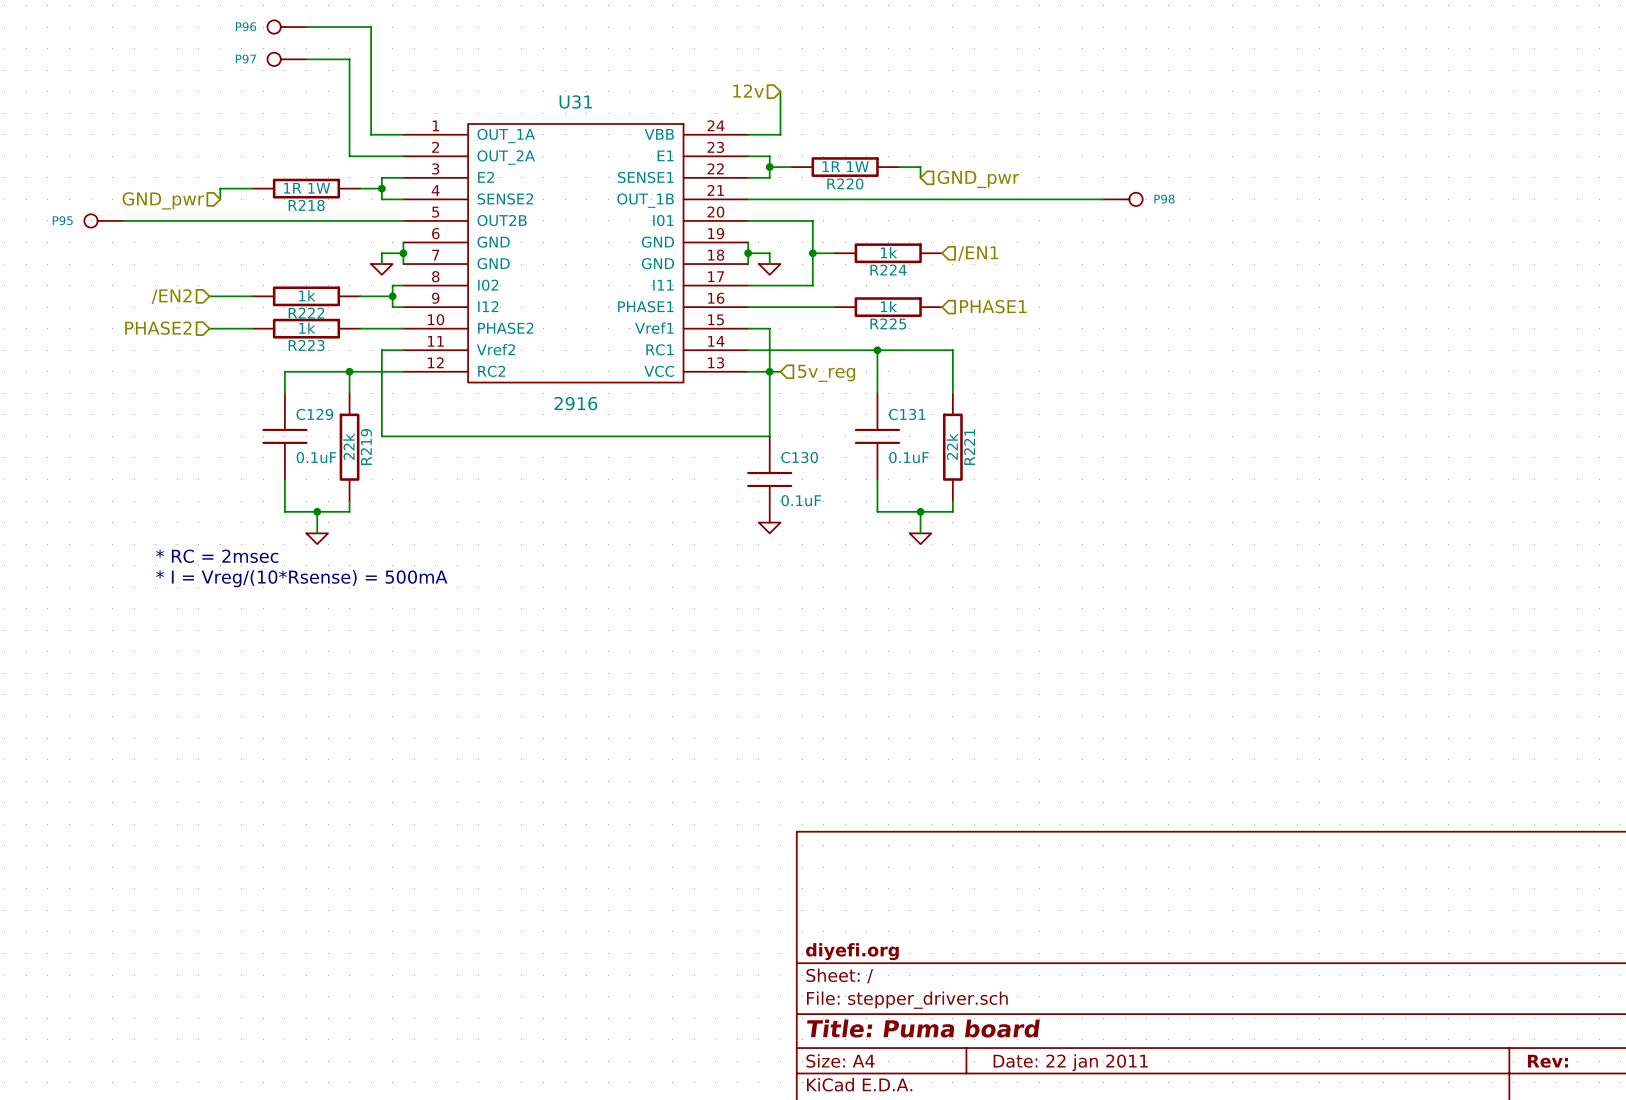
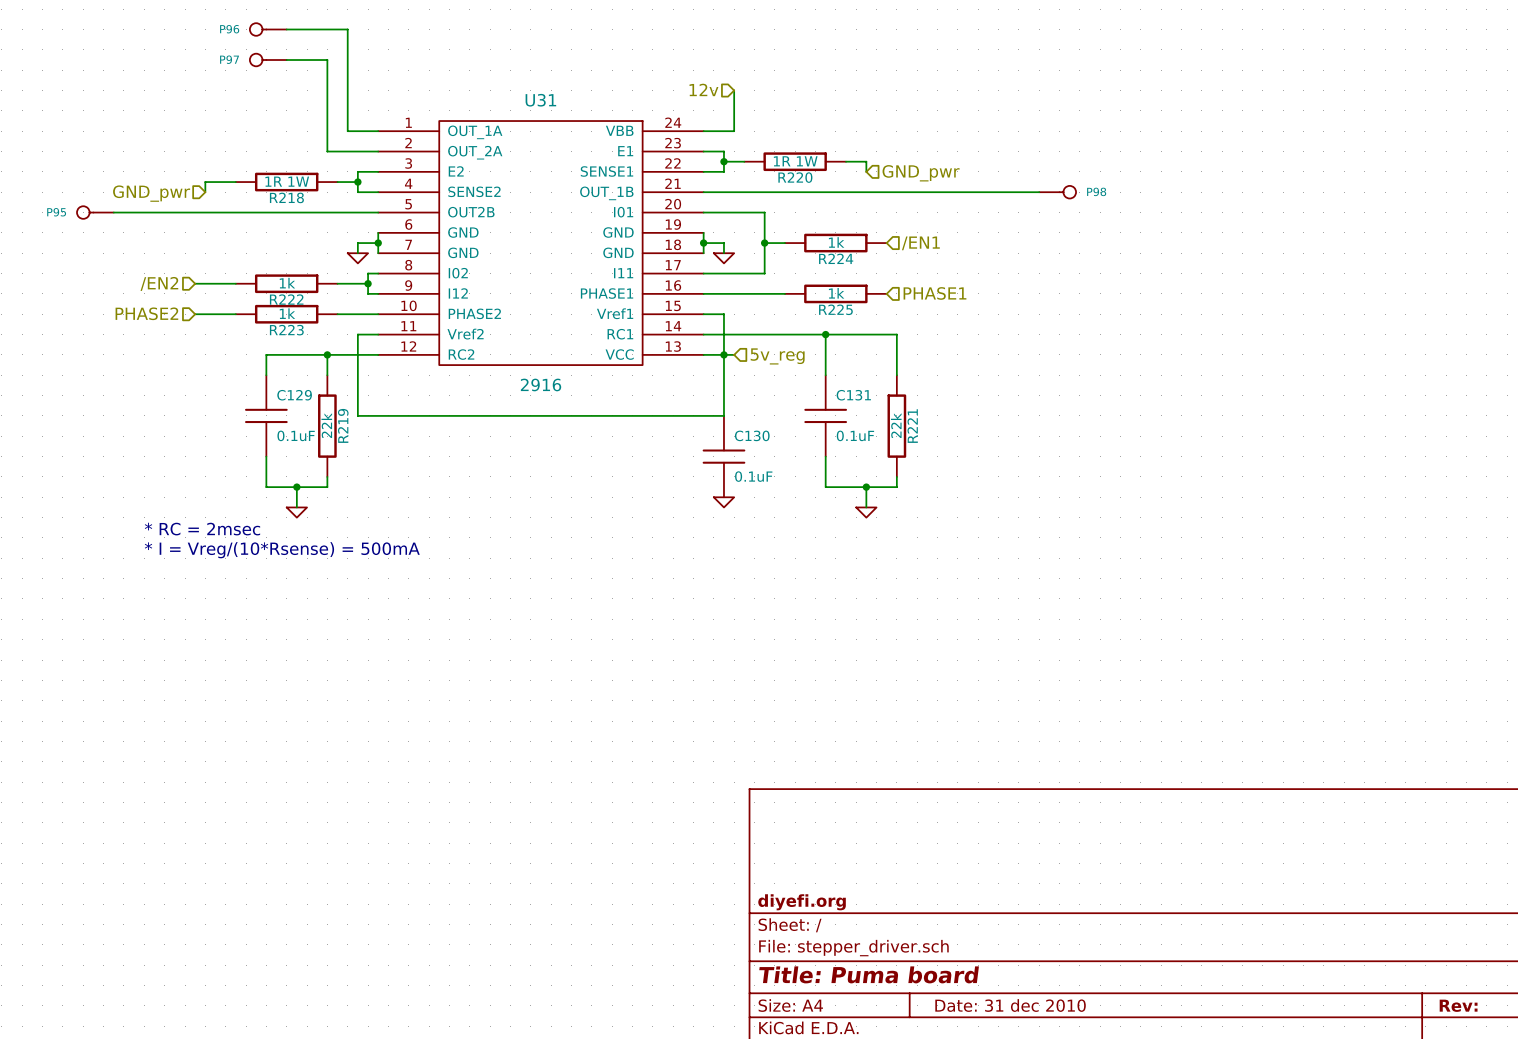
title block: Date: 22 jan 2011 (1070, 1062) -> Date: 31 dec 2010 (1010, 1005)

